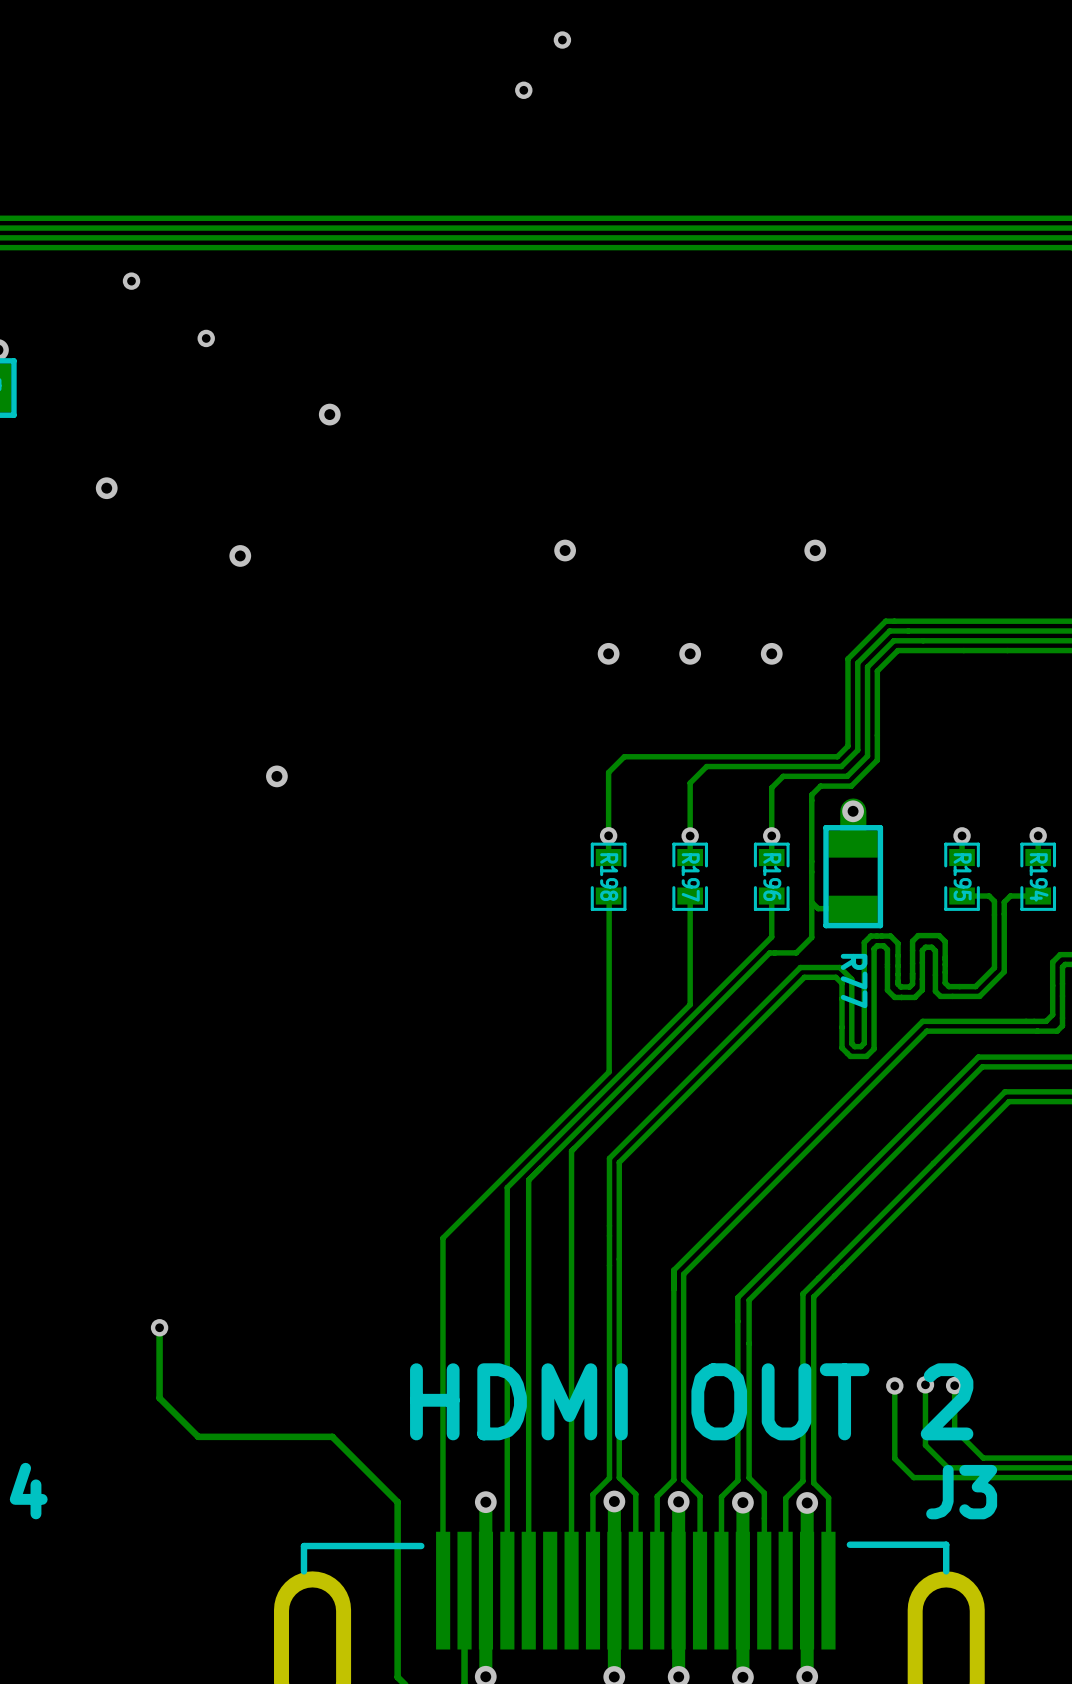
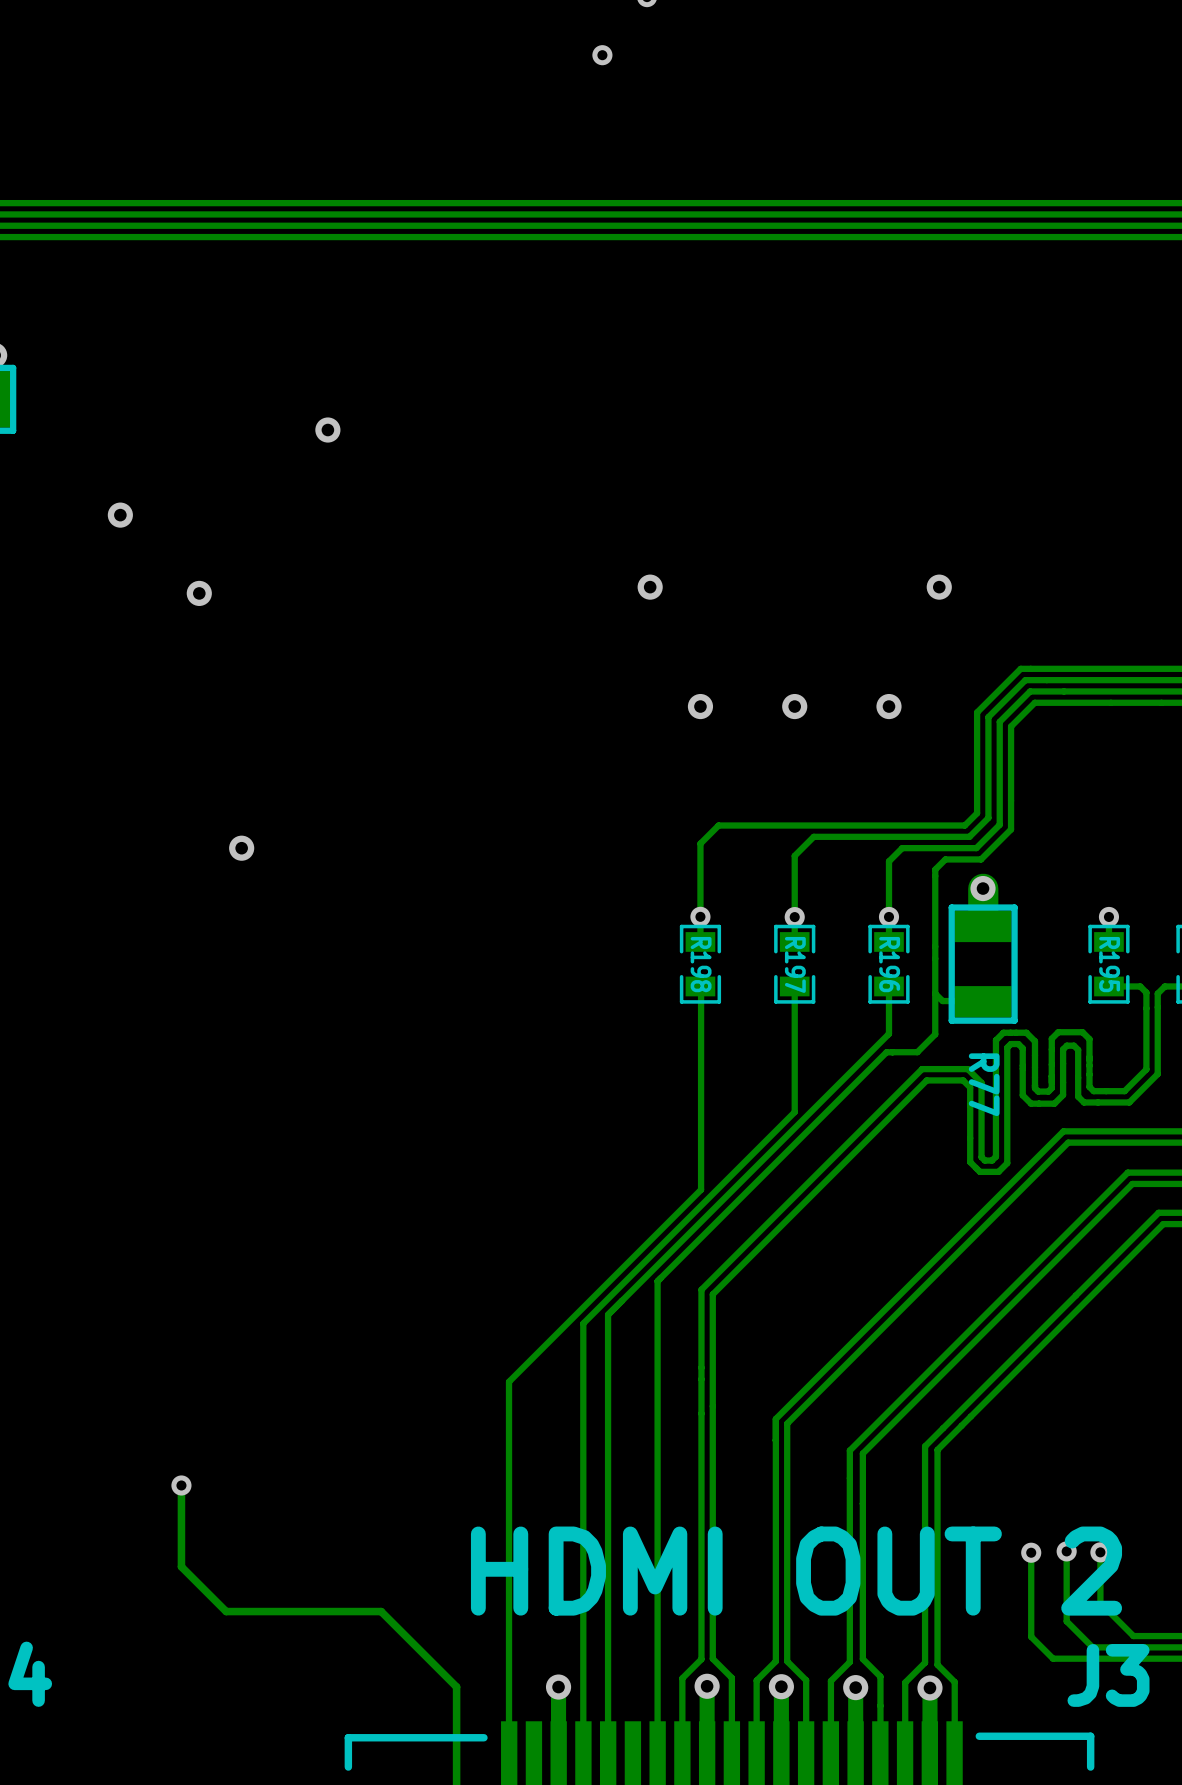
via: (131, 281) -> none
via: (206, 338) -> none
via position: (329, 414) -> (327, 430)
via position: (240, 555) -> (199, 593)
via position: (276, 776) -> (241, 848)

